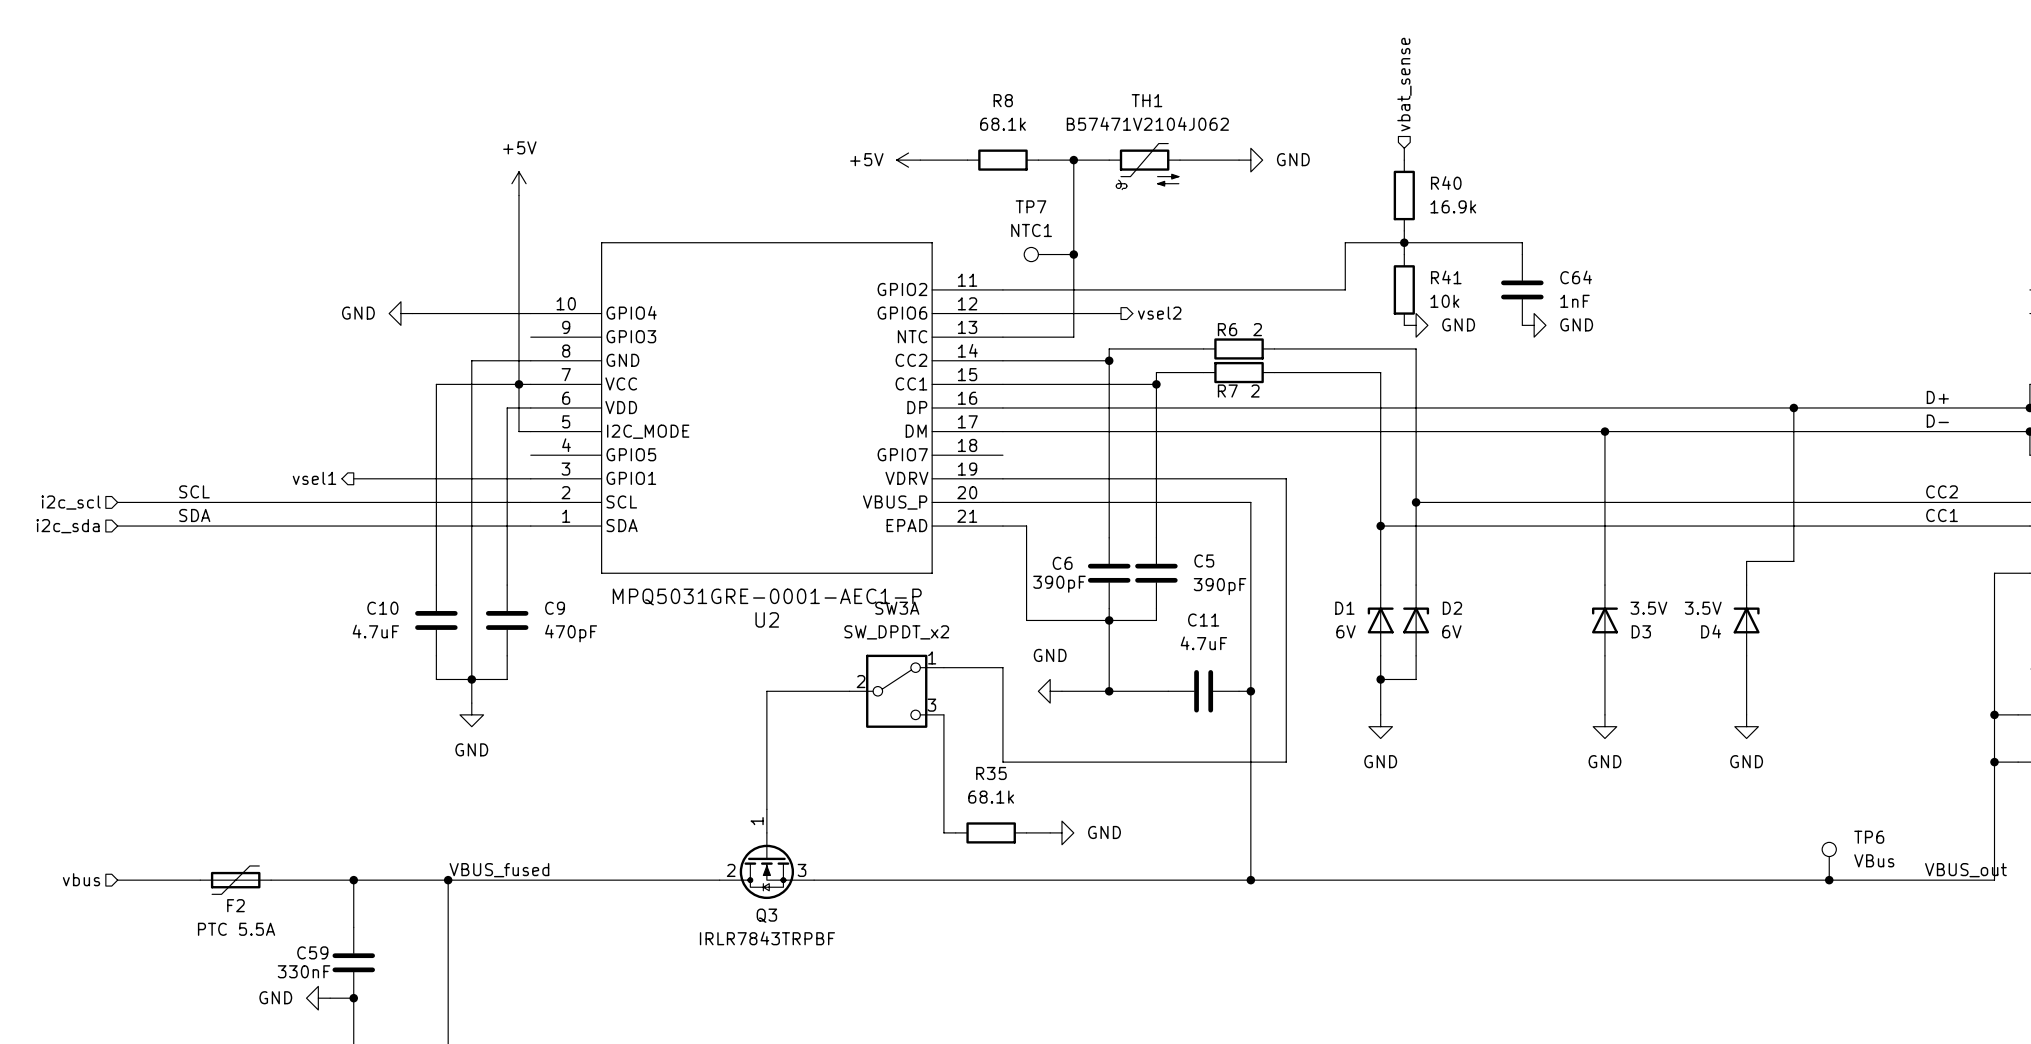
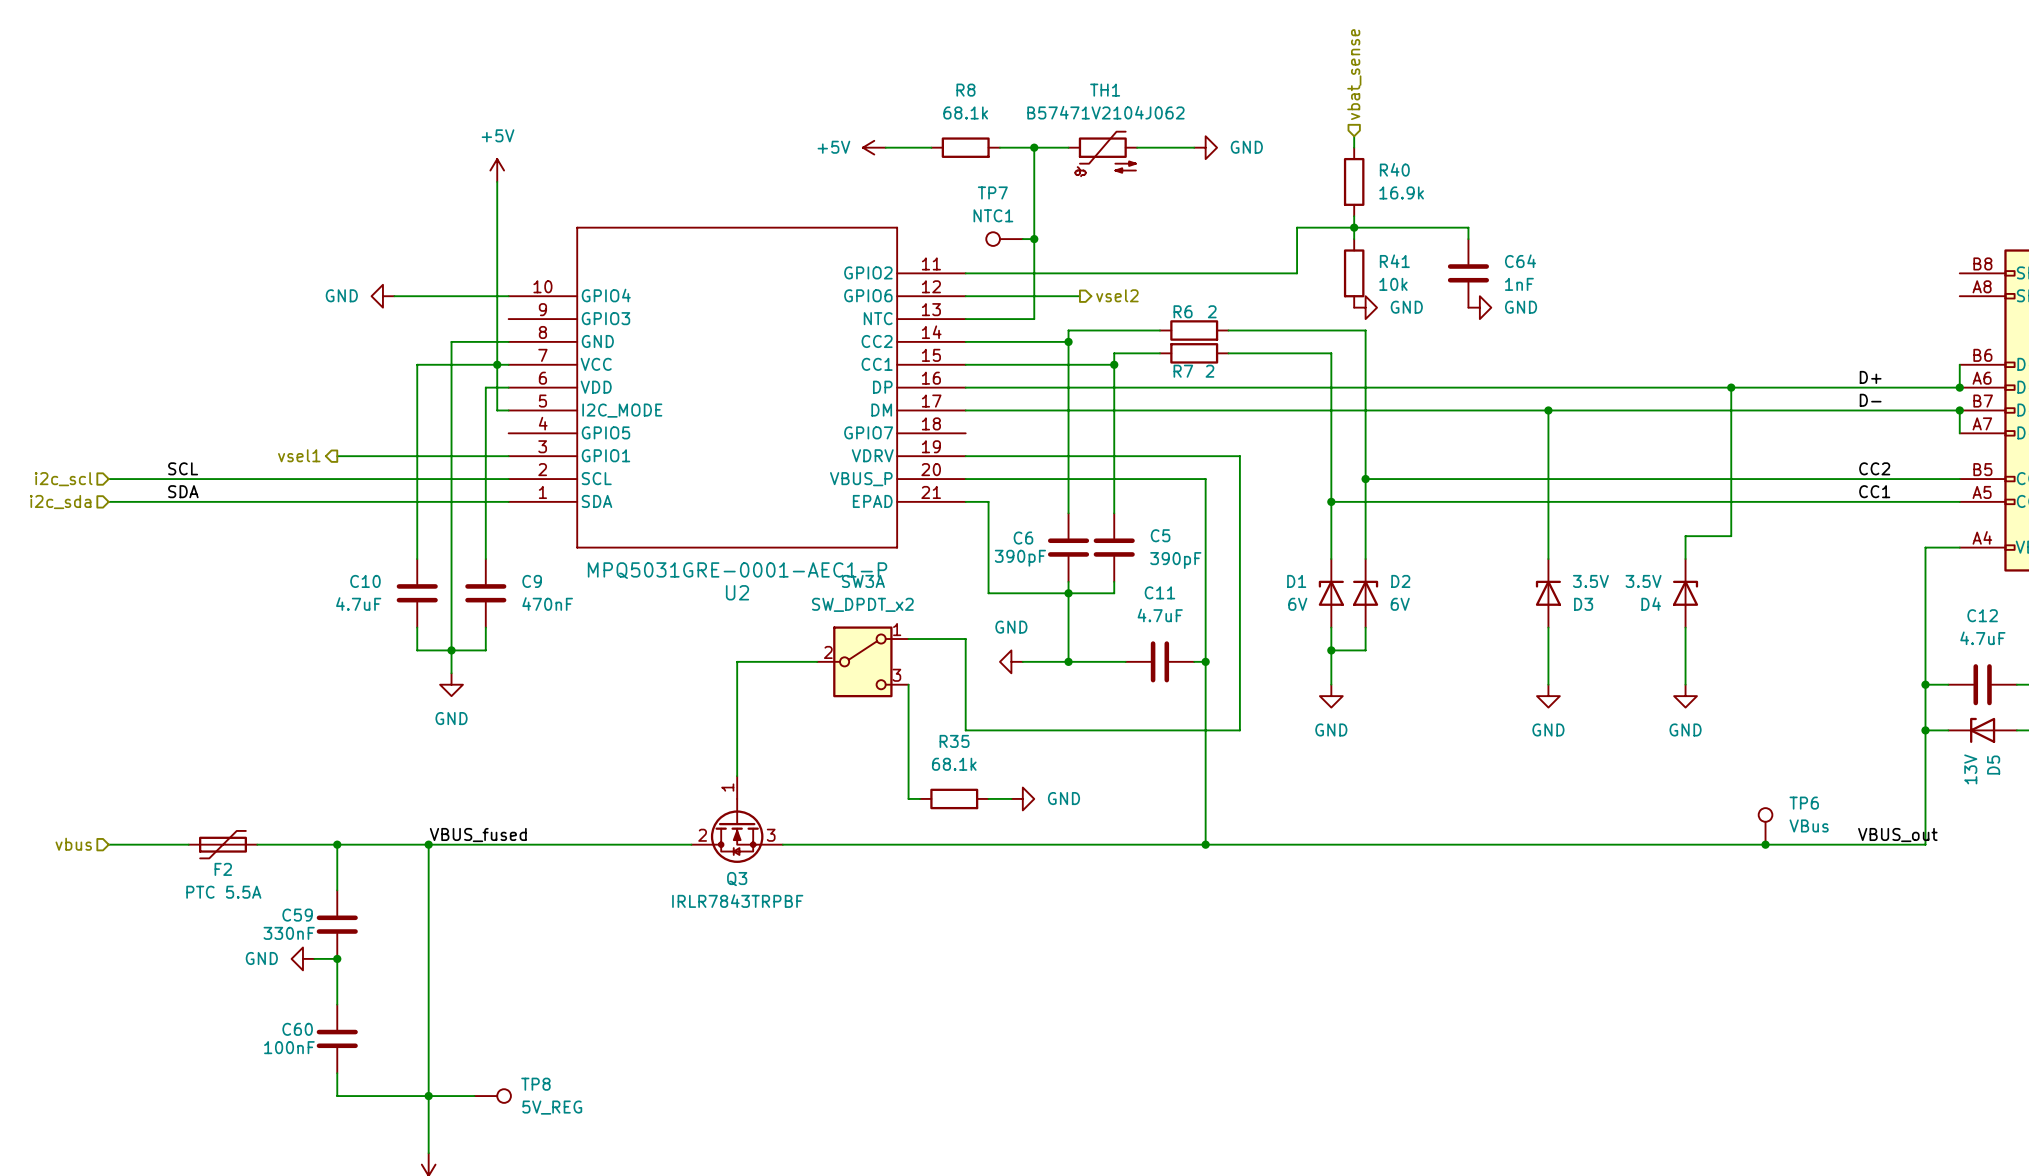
C9 value: 470pF (571, 633) -> 470nF (547, 604)

